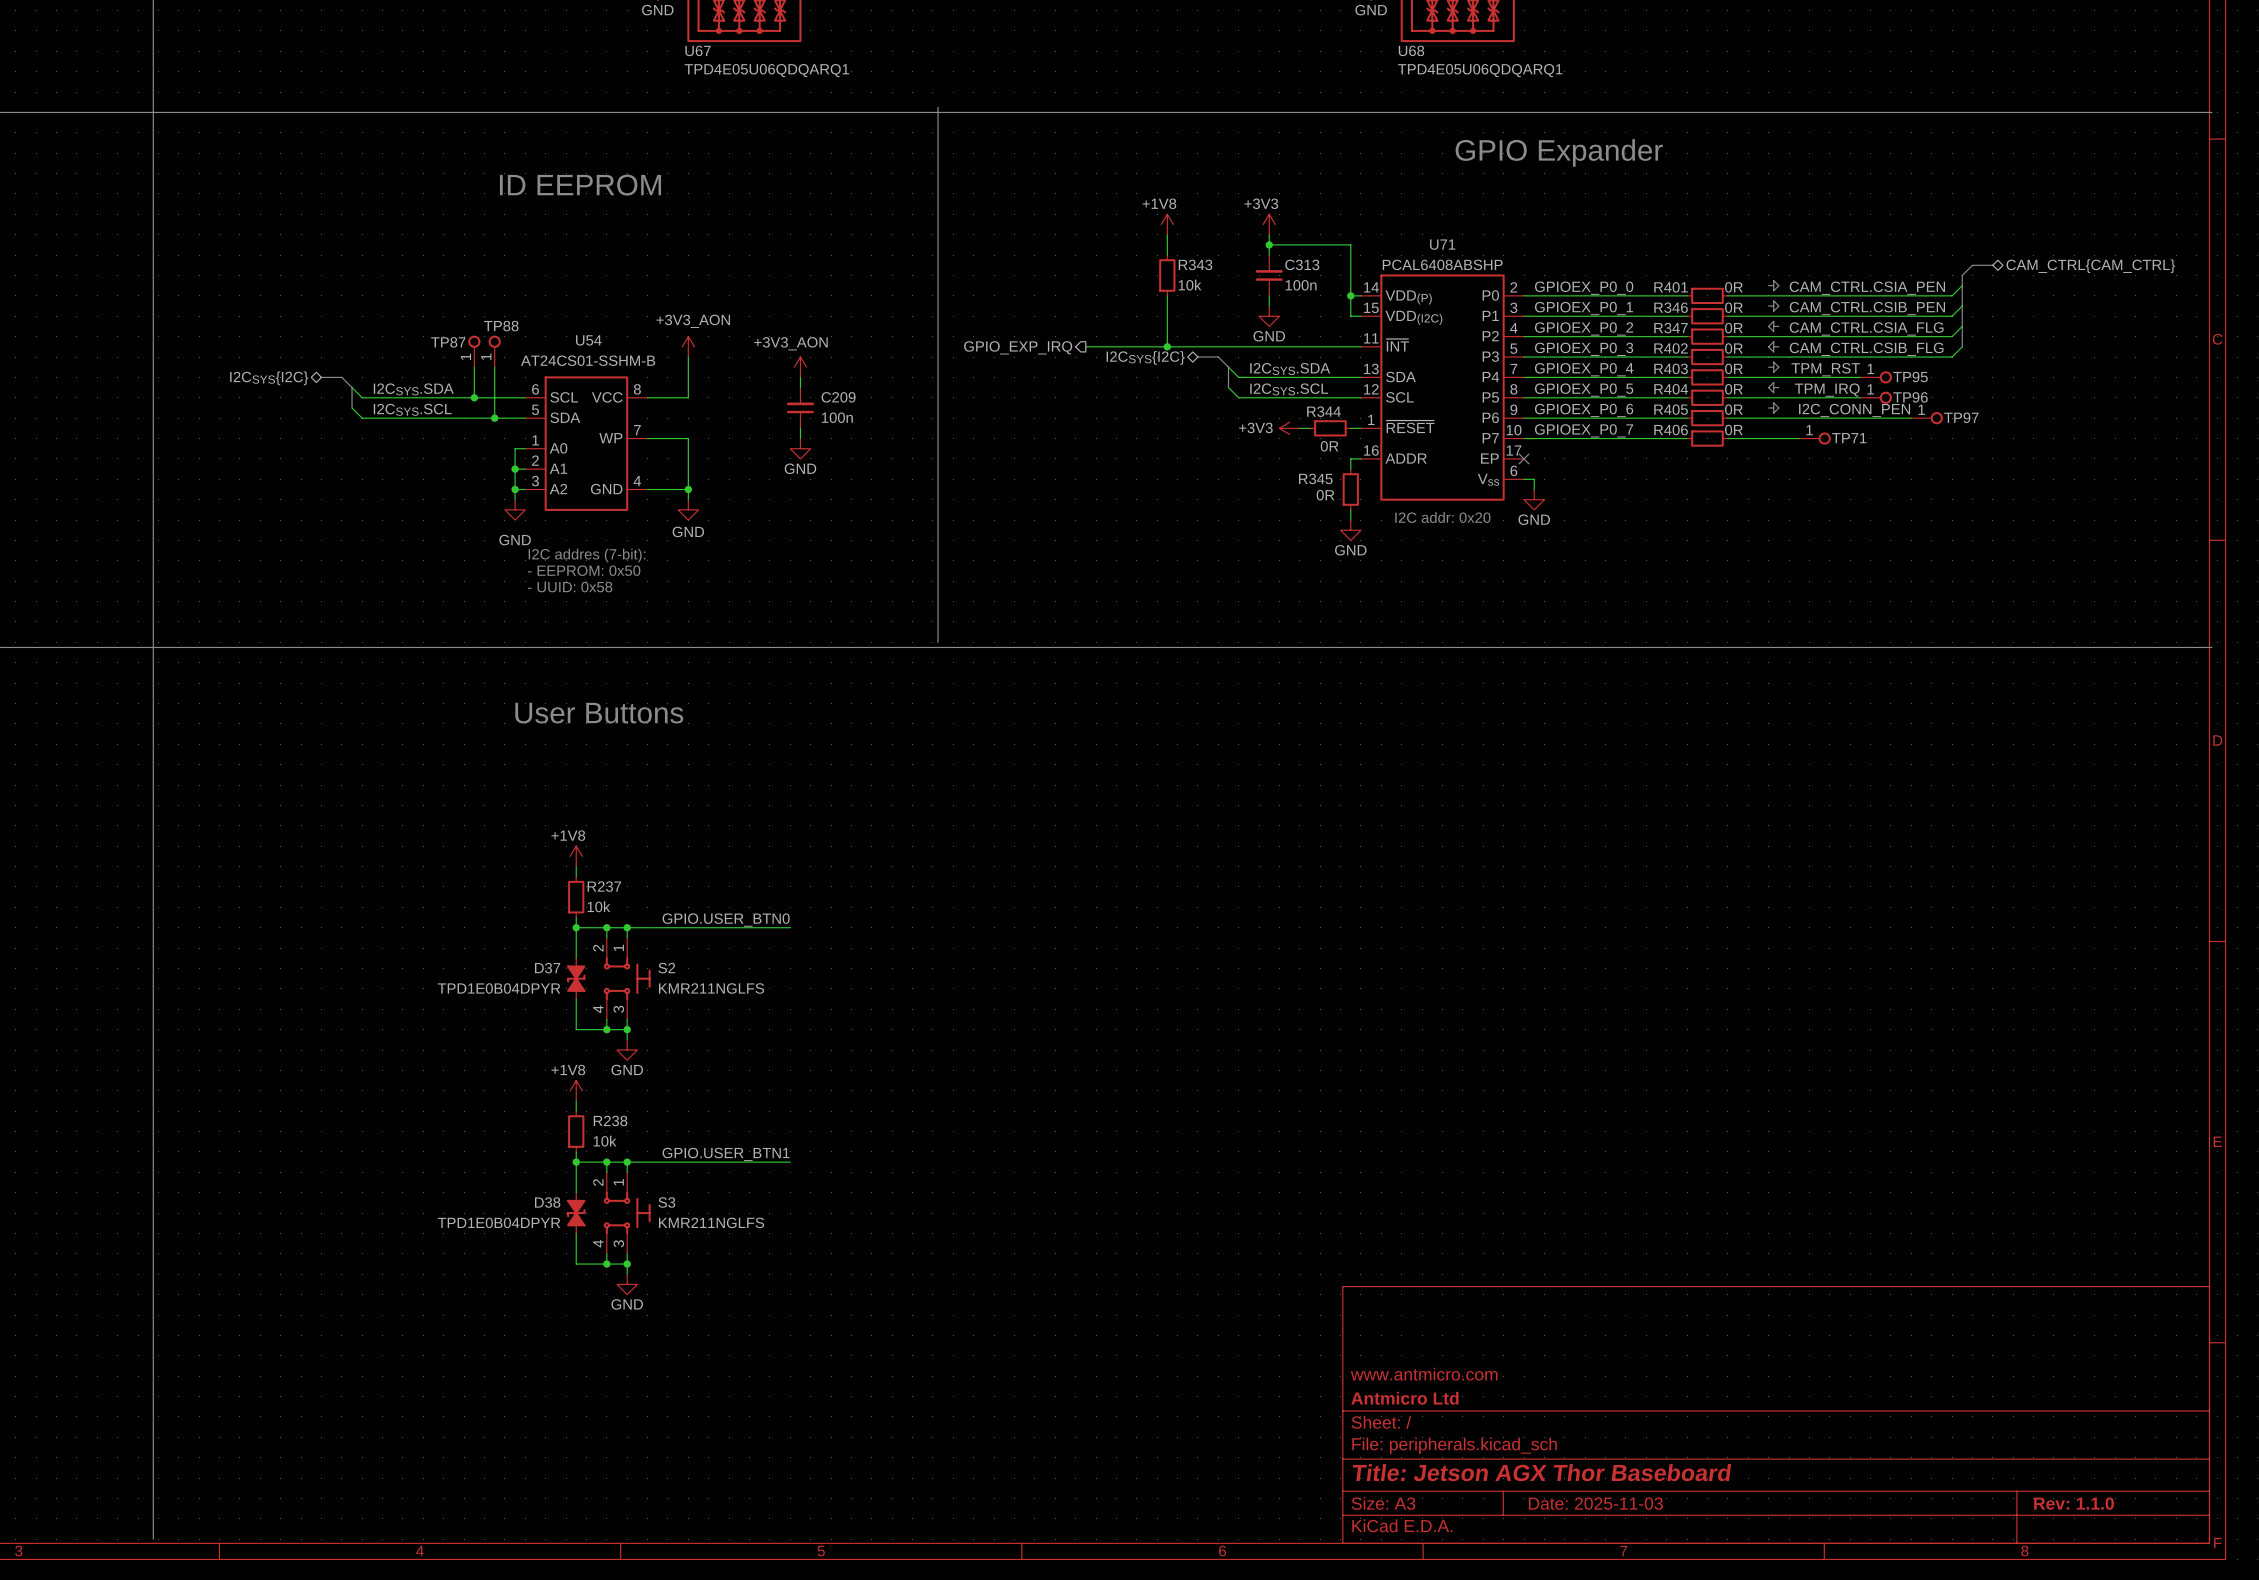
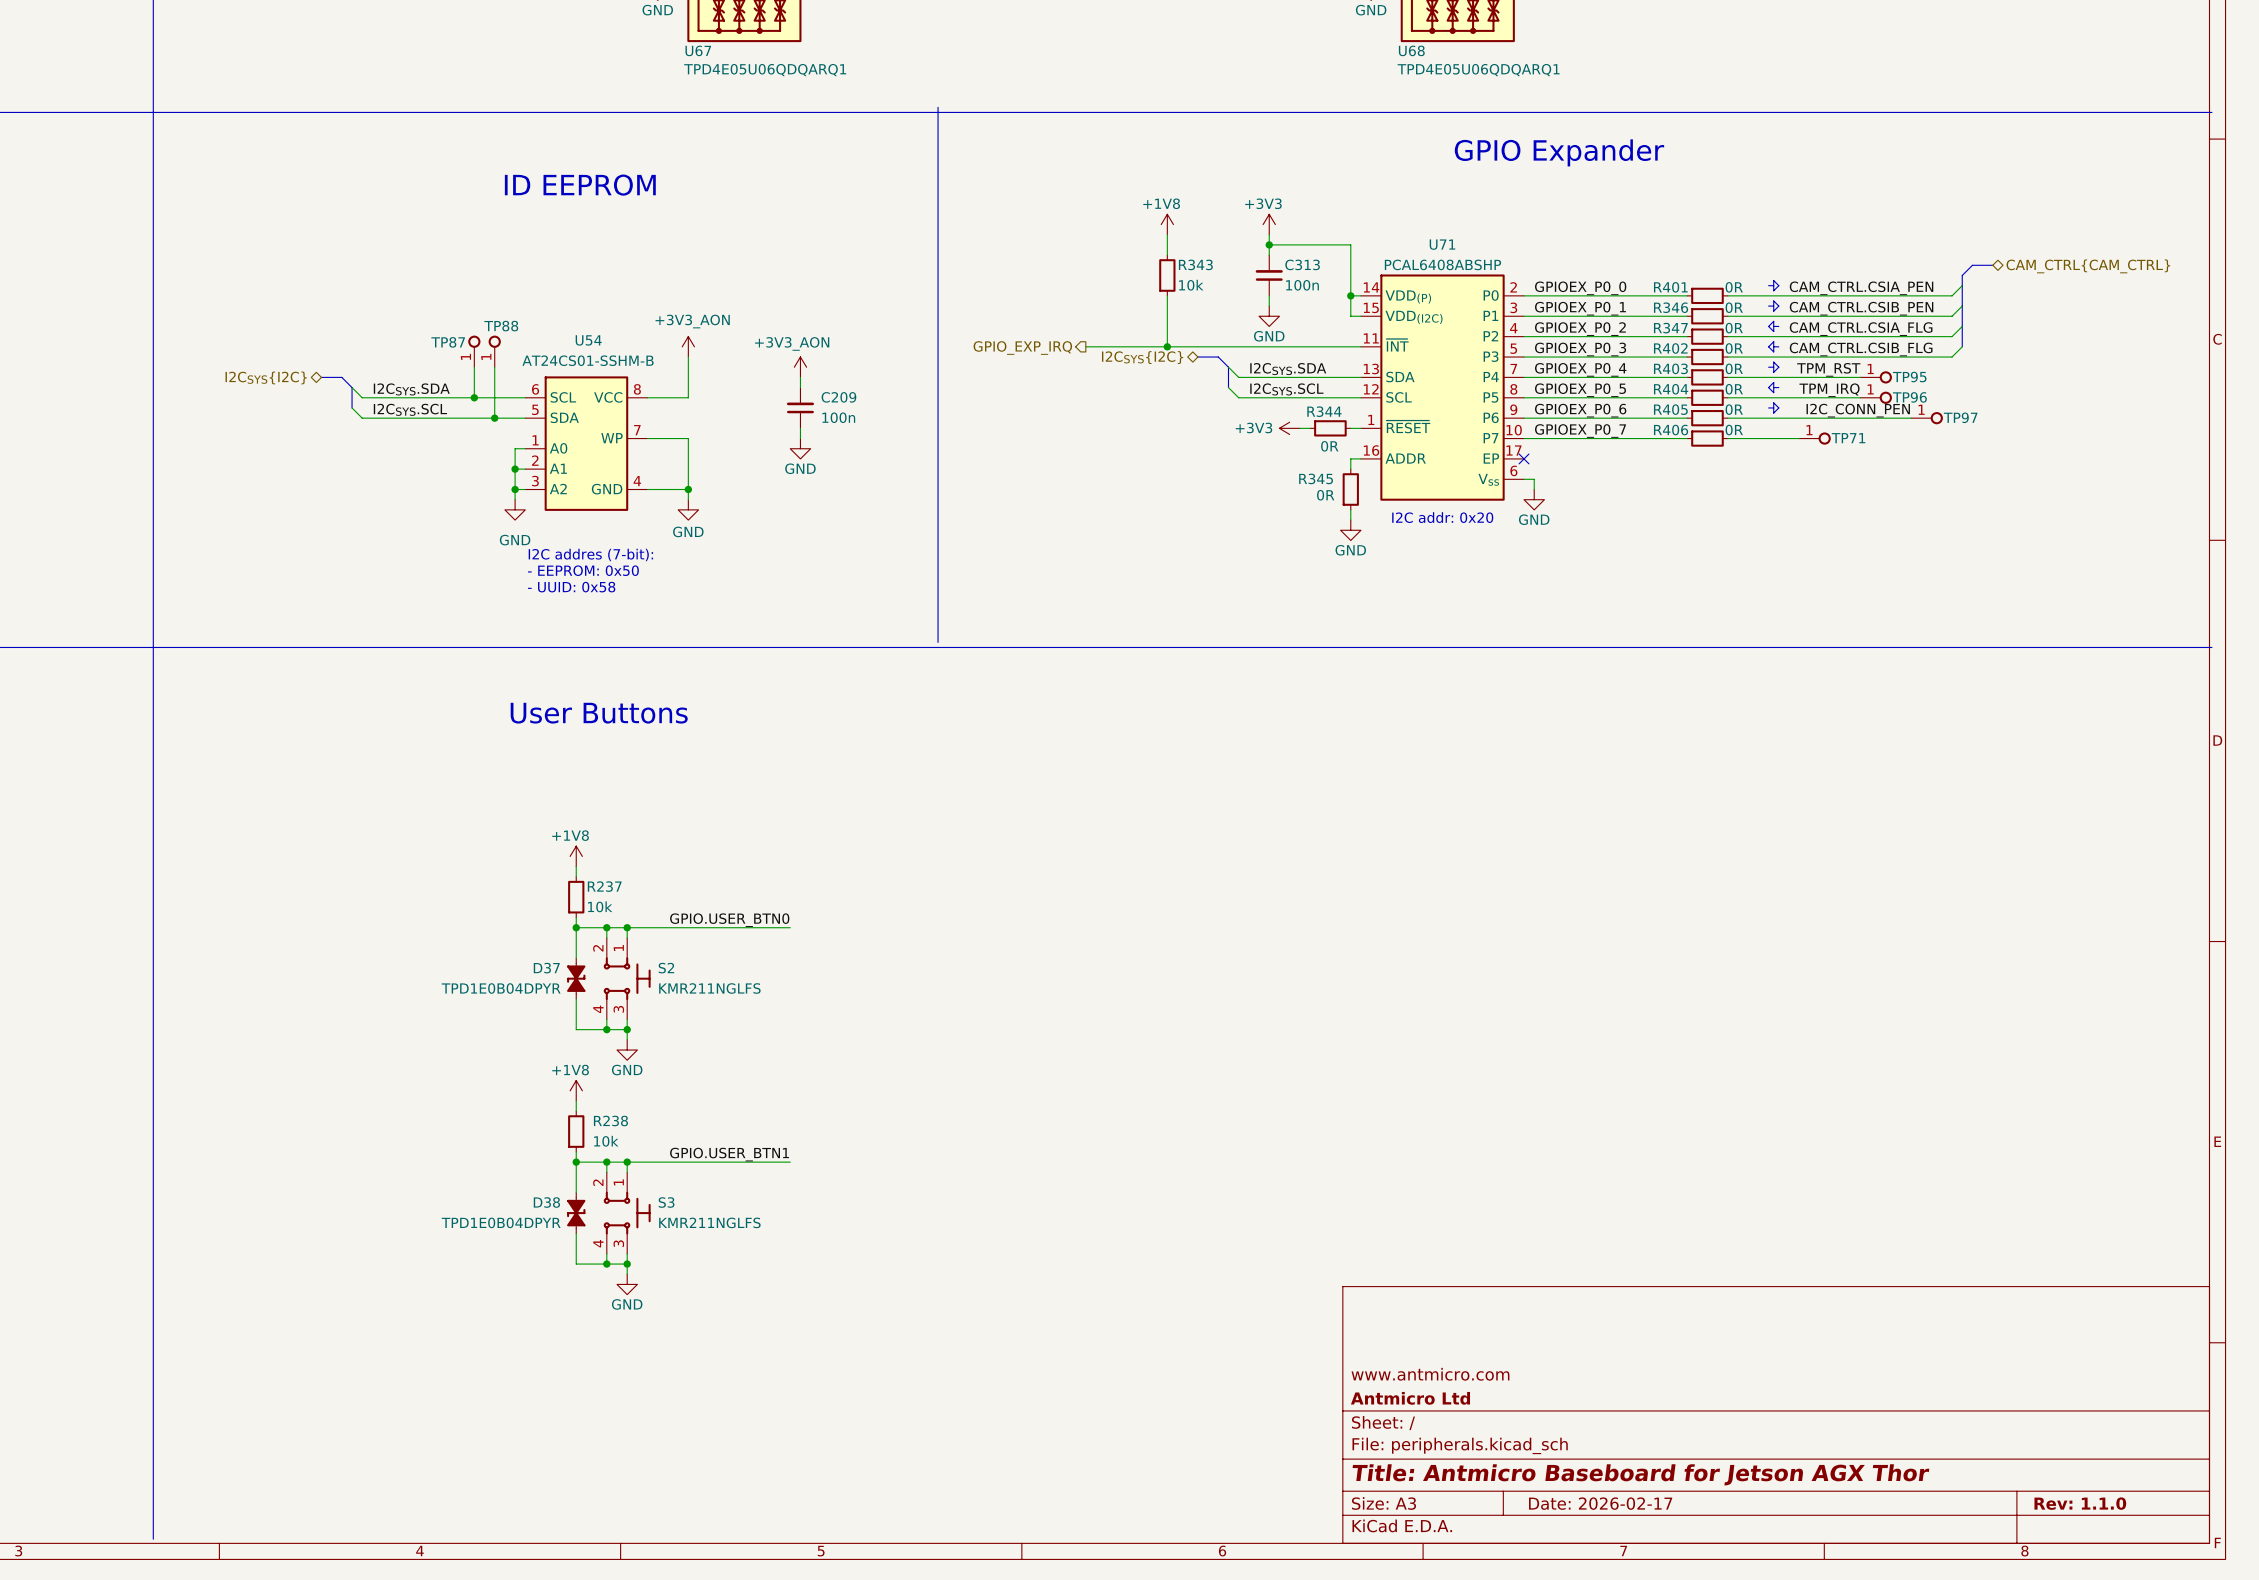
title block: Title: Jetson AGX Thor Baseboard (1541, 1472) -> Title: Antmicro Baseboard for Jetson AGX Thor (1640, 1474)
title block: Date: 2025-11-03 (1595, 1503) -> Date: 2026-02-17 (1600, 1503)

